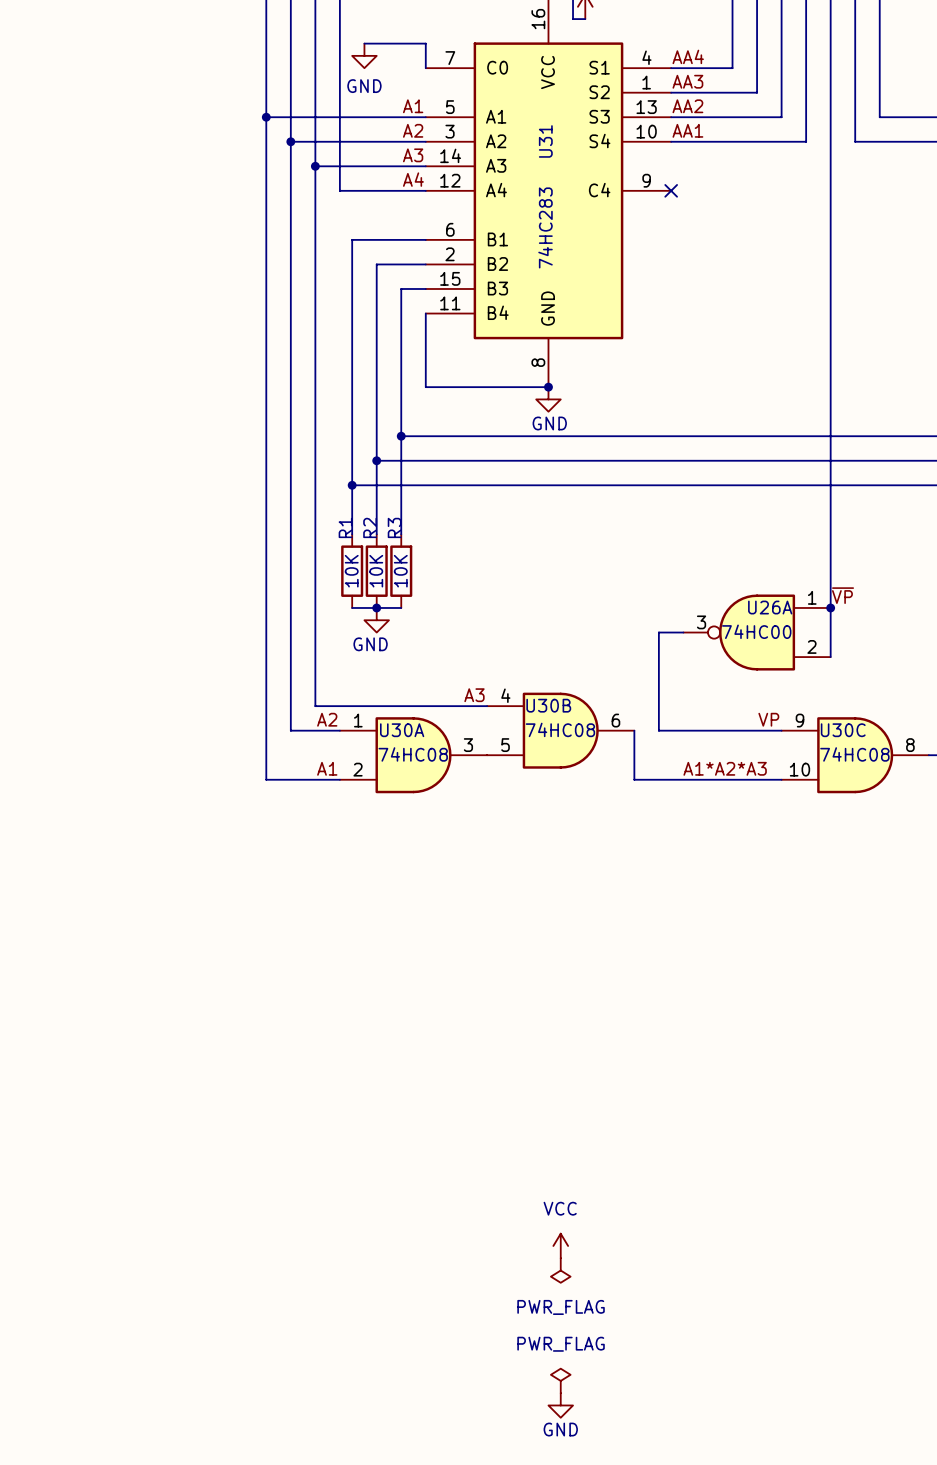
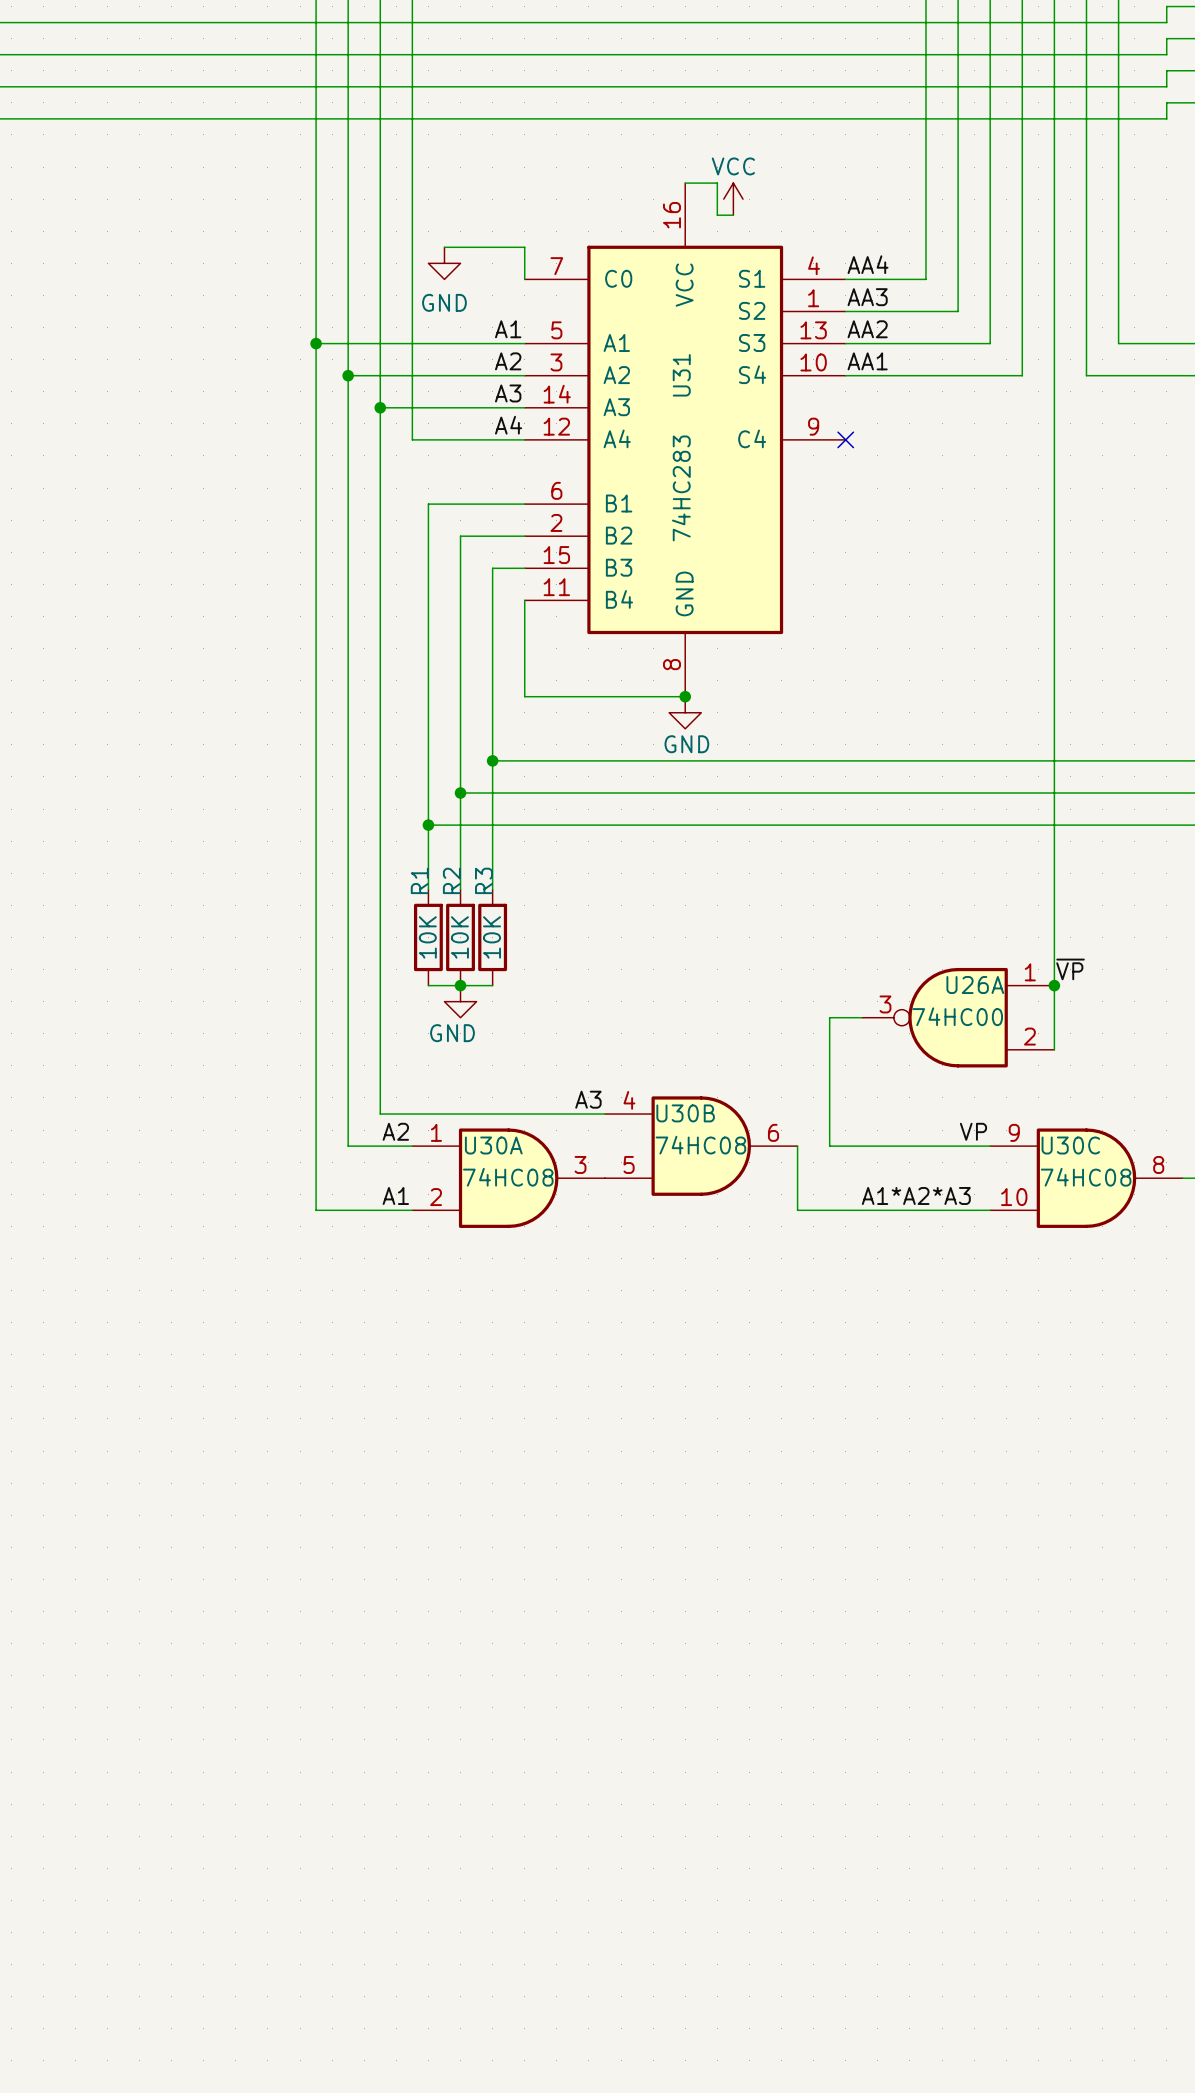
power symbol: VCC (560, 1245) -> none
power symbol: PWR_FLAG (560, 1270) -> none
power symbol: PWR_FLAG (560, 1380) -> none
power symbol: GND (560, 1405) -> none

